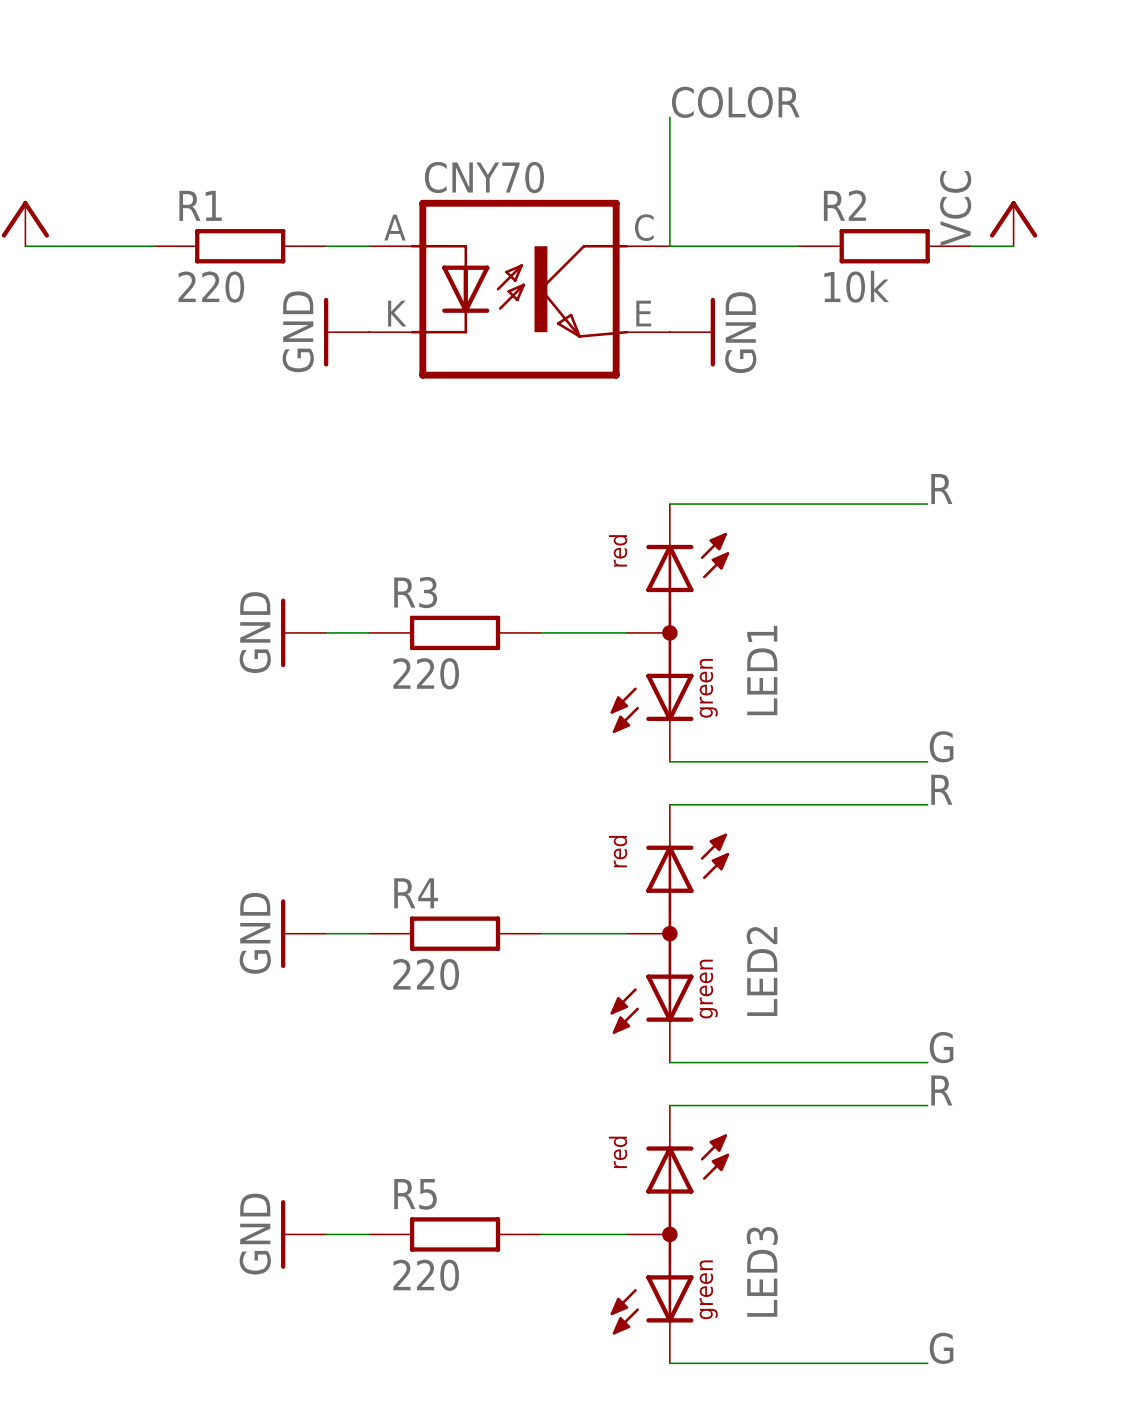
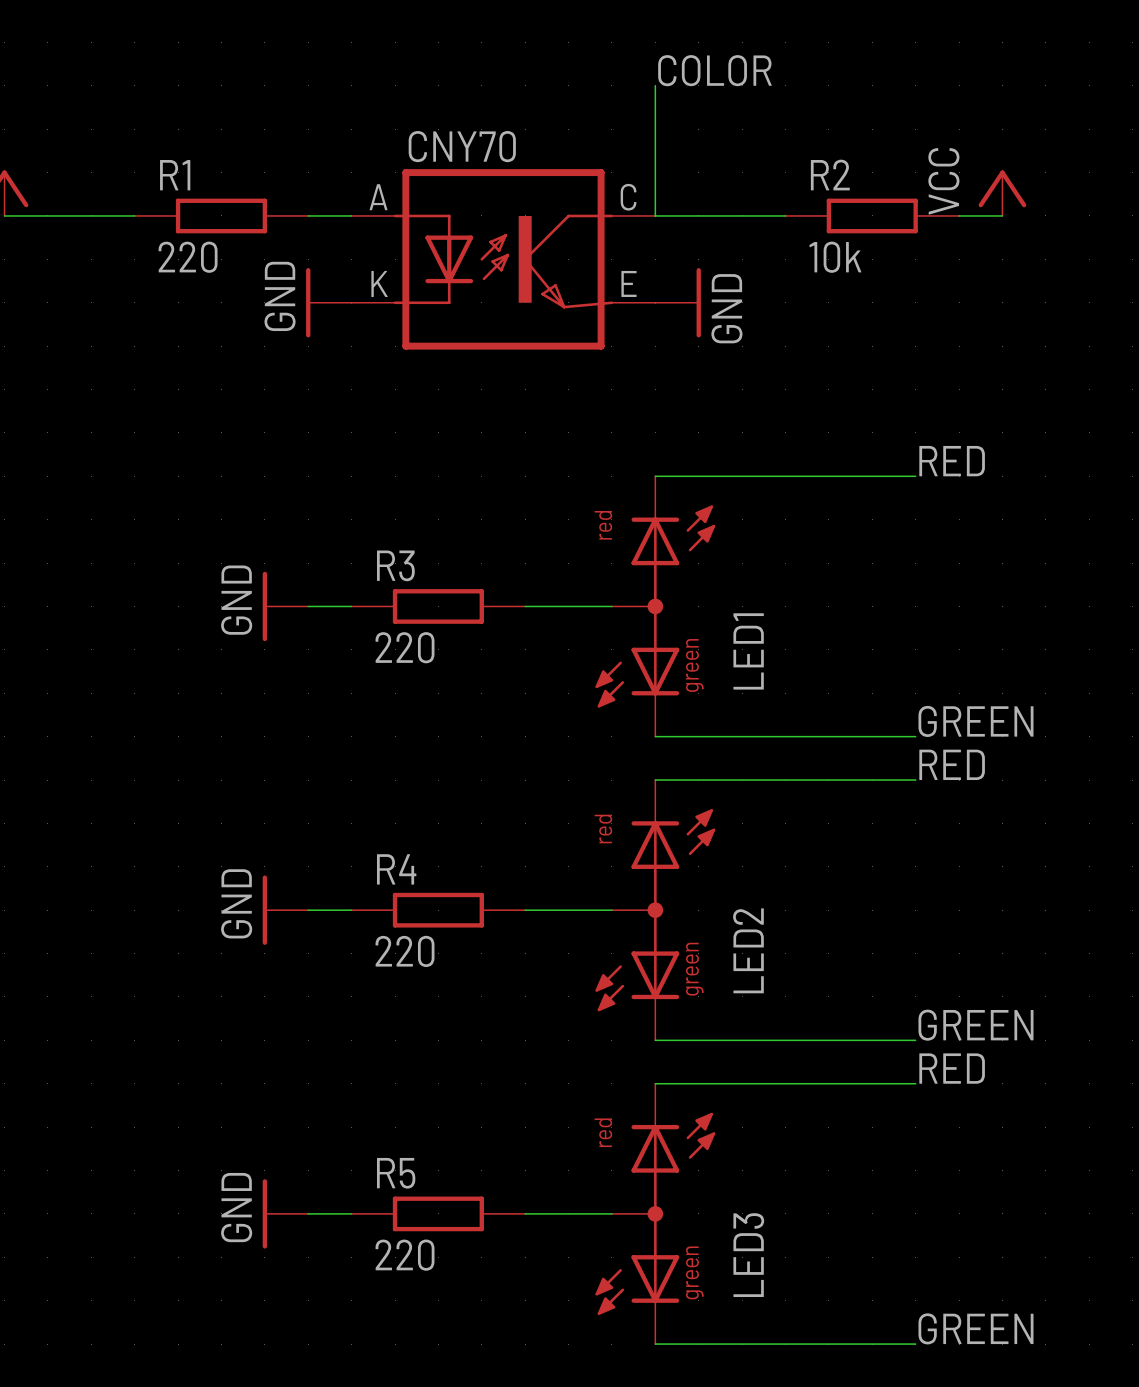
label: R (941, 489) -> RED (952, 461)
label: G (941, 746) -> GREEN (975, 721)
label: R (941, 789) -> RED (952, 764)
label: G (941, 1047) -> GREEN (975, 1025)
label: R (941, 1090) -> RED (952, 1068)
label: G (941, 1348) -> GREEN (975, 1328)

